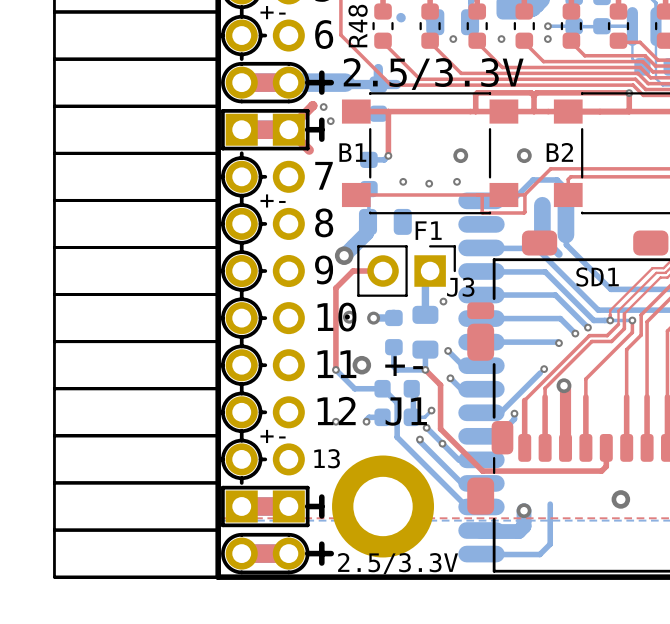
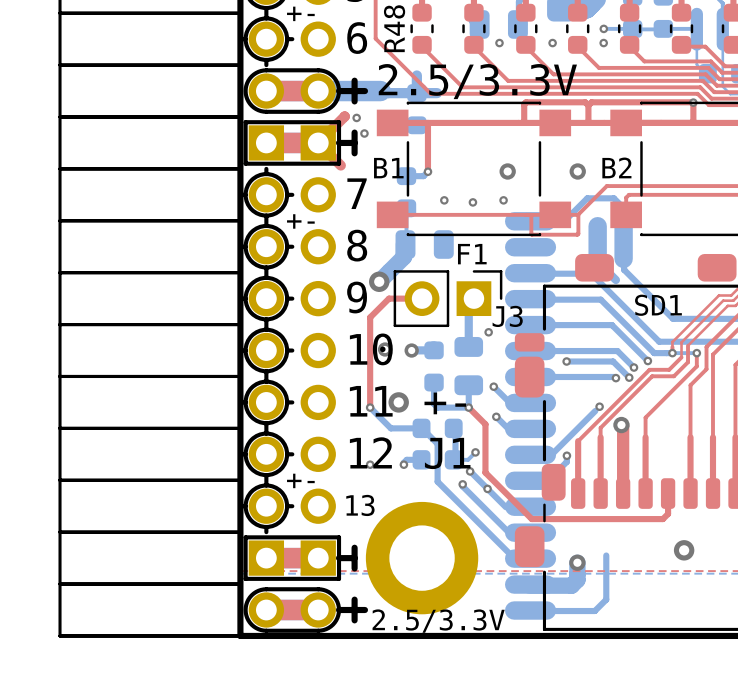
bottom track: (400, 17) (401, 17) -> none
bottom track: none -> (566, 361) (613, 361) (629, 377)
via: none -> (566, 361)
via: none -> (629, 377)

